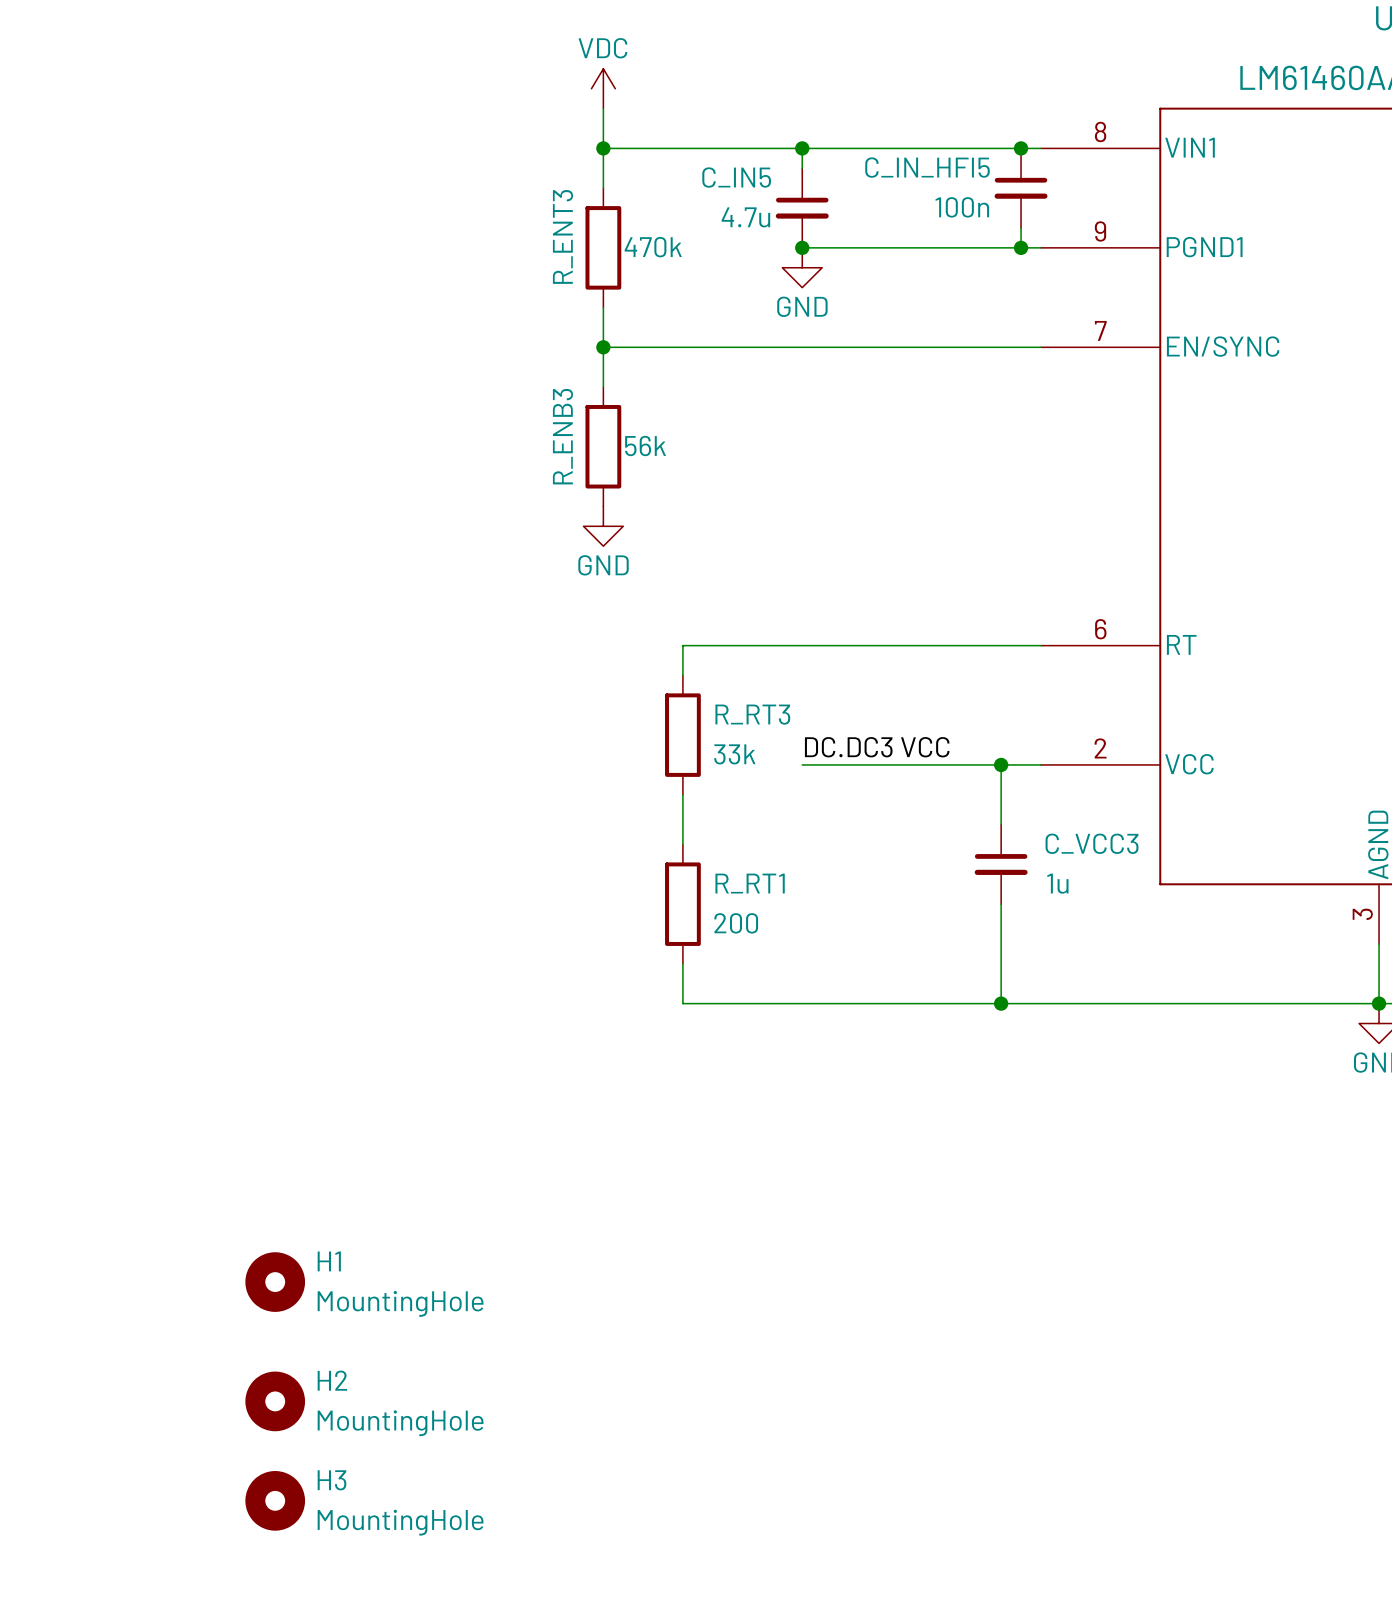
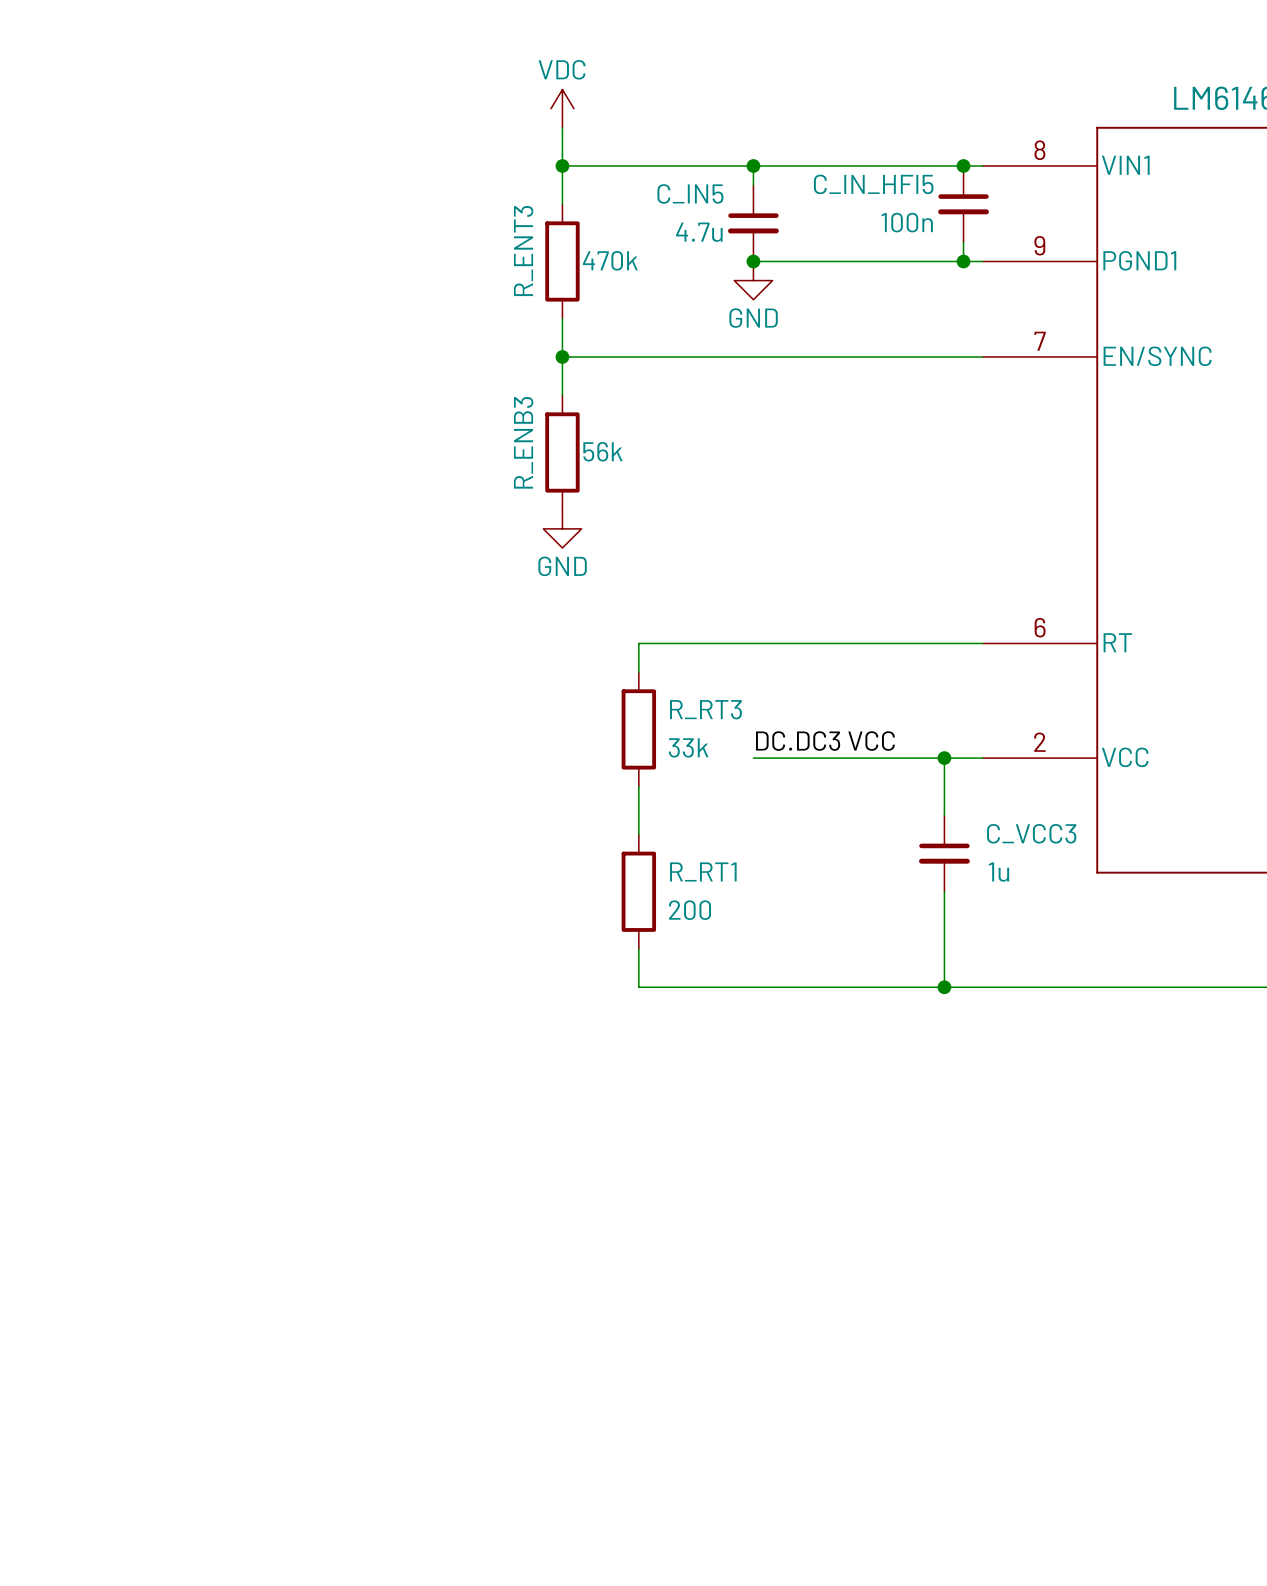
H1: MountingHole (275, 1282) -> none
H2: MountingHole (275, 1401) -> none
H3: MountingHole (275, 1500) -> none

